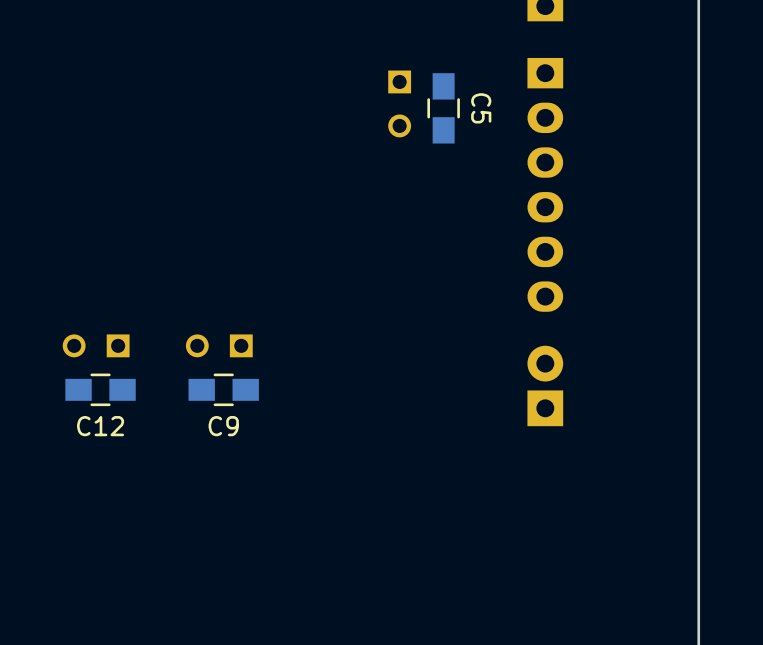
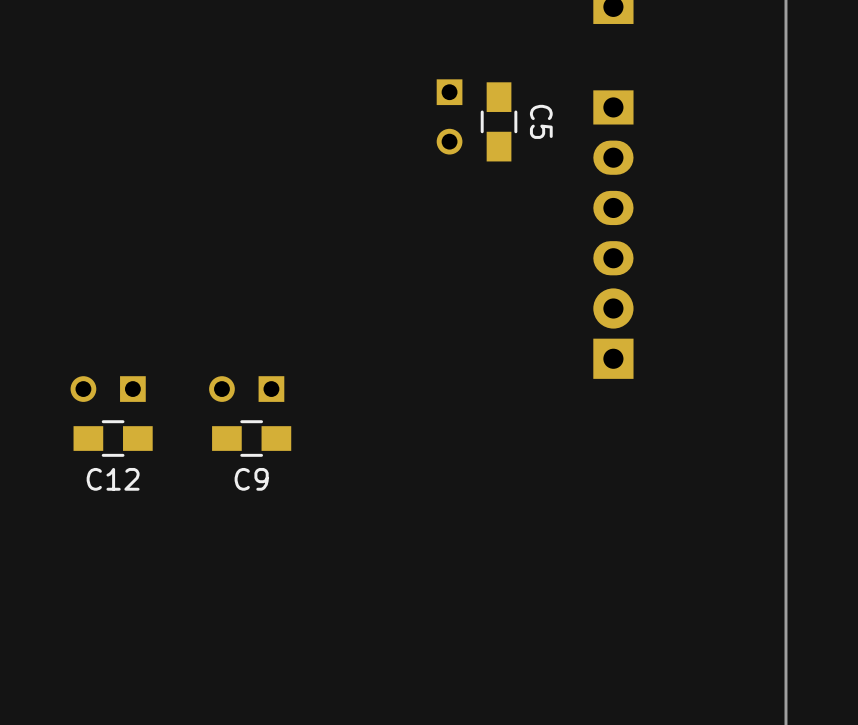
part: none -> (613, 182)
part: (545, 184) -> none
part position: (545, 385) -> (613, 333)

